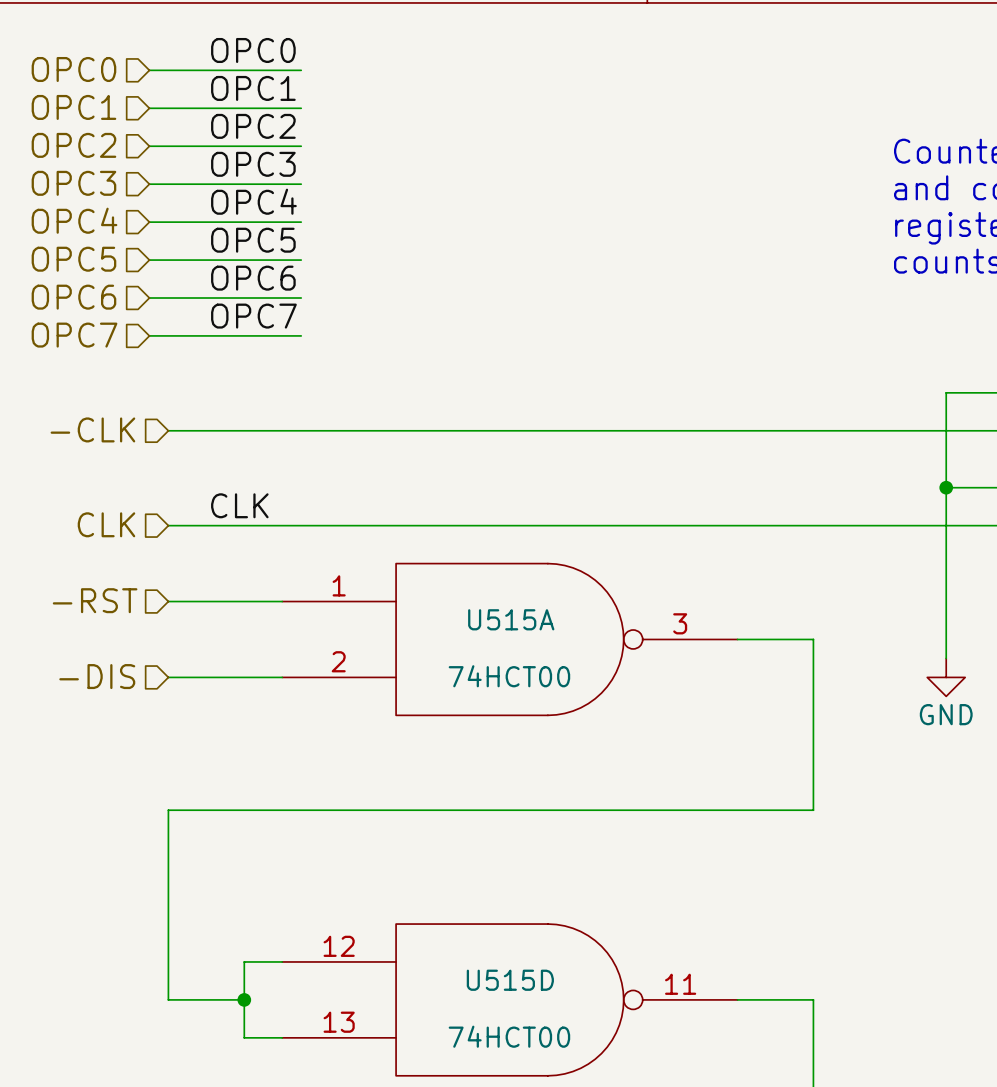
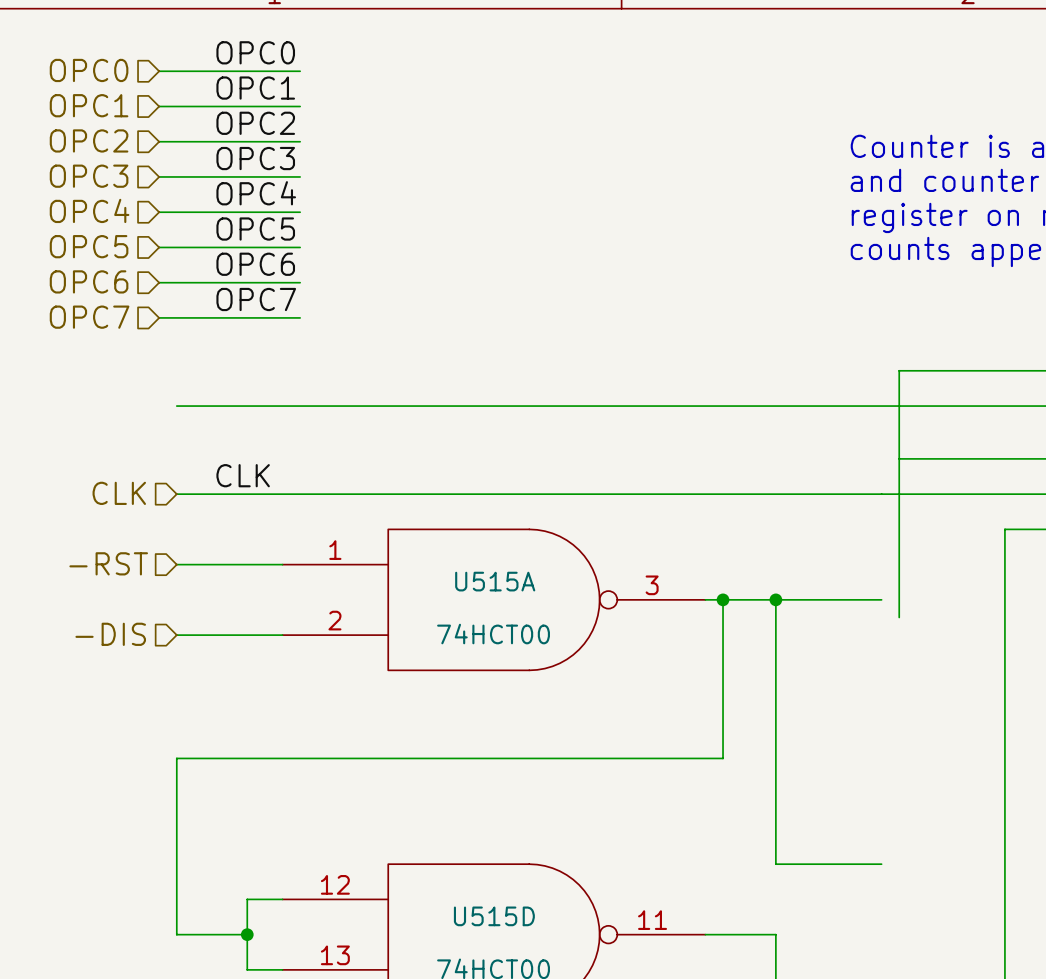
hierarchical label: -CLK (92, 429) -> none
junction: (946, 487) -> none
junction: none -> (723, 599)
wire: none -> (775, 599) (881, 599)
junction: none -> (775, 599)
power symbol: GND (946, 677) -> none
wire: (756, 810) (813, 810) -> (723, 758) (723, 599)
wire: none -> (775, 758) (775, 864) (881, 864)

